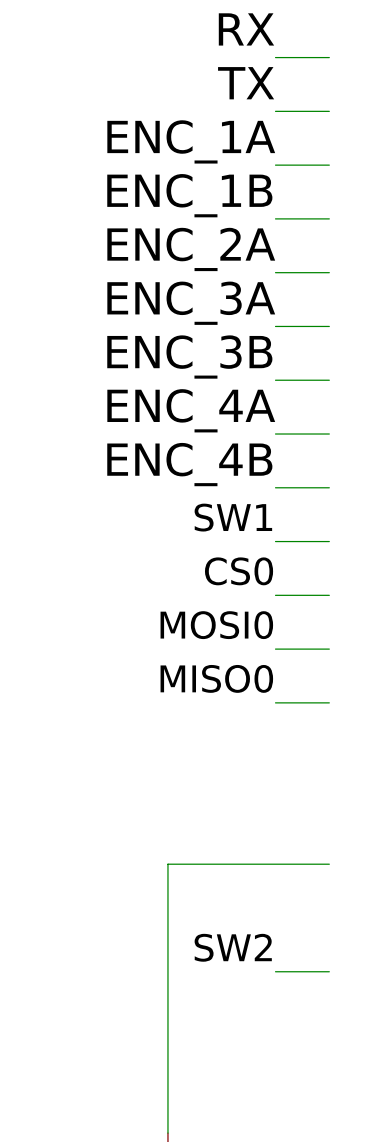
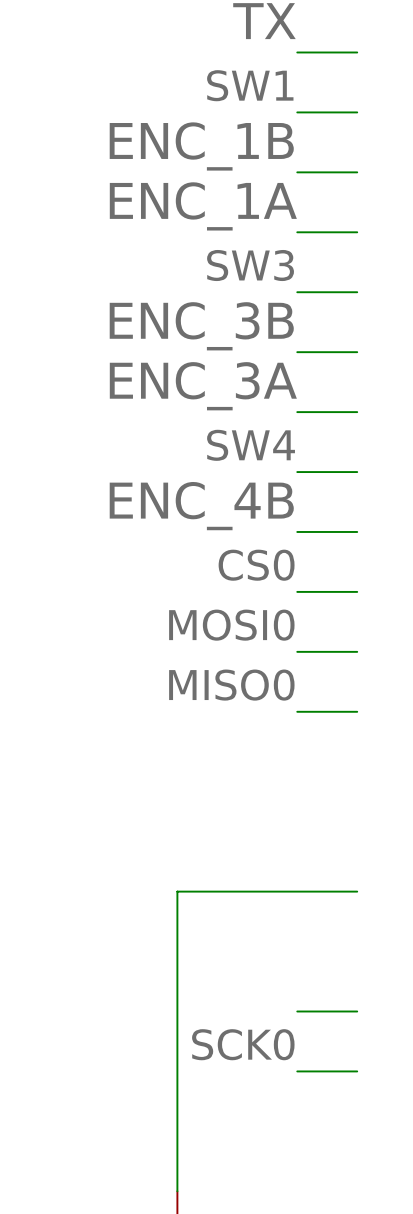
label: ENC_1A (191, 141) -> SW1 (250, 85)
label: ENC_2A (191, 249) -> ENC_1A (203, 206)
label: ENC_3A (191, 303) -> SW3 (250, 265)
label: ENC_4A (191, 410) -> ENC_3A (203, 386)
label: ENC_4B (189, 464) -> SW4 (251, 445)
label: SW1 (233, 517) -> ENC_4B (201, 506)
label: SW2 (233, 947) -> none
label: none -> SCK0 (243, 1044)
wire: none -> (297, 1071) (357, 1071)

